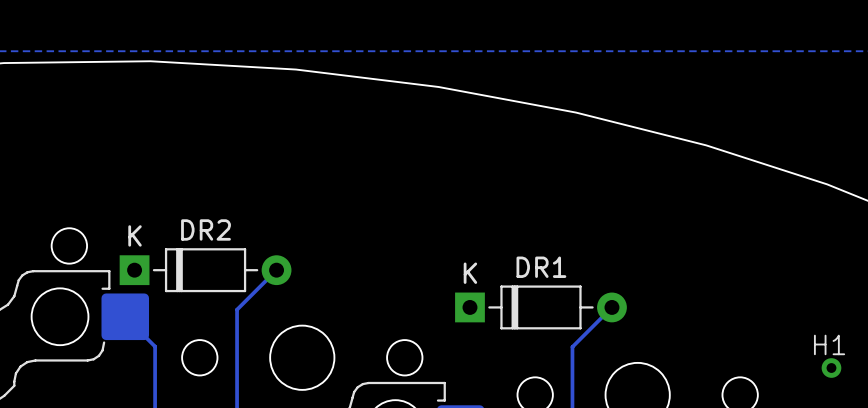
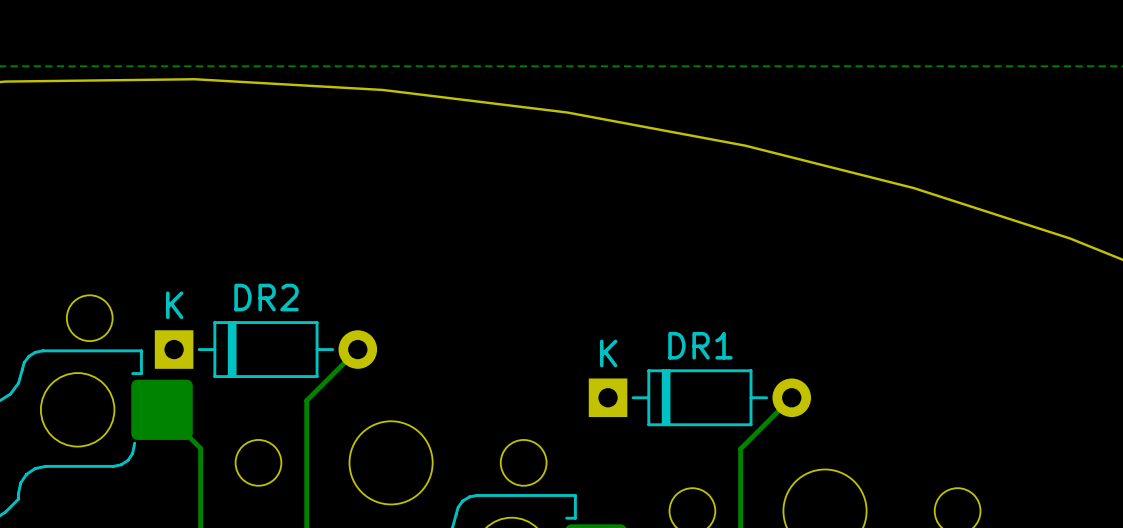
H1: (831, 368) -> none

